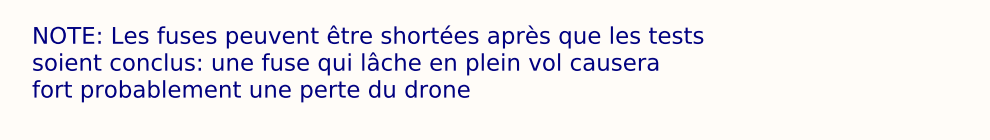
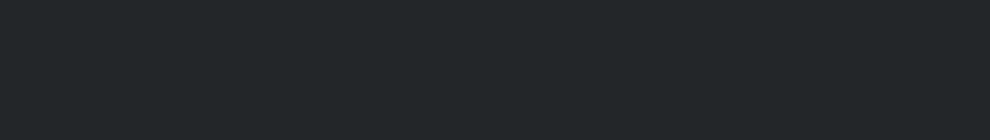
text: NOTE: Les fuses peuvent être shortées après que les tests (368, 36) -> none
text: soient conclus: une fuse qui lâche en plein vol causera (345, 63) -> none
text: fort probablement une perte du drone (251, 91) -> none

